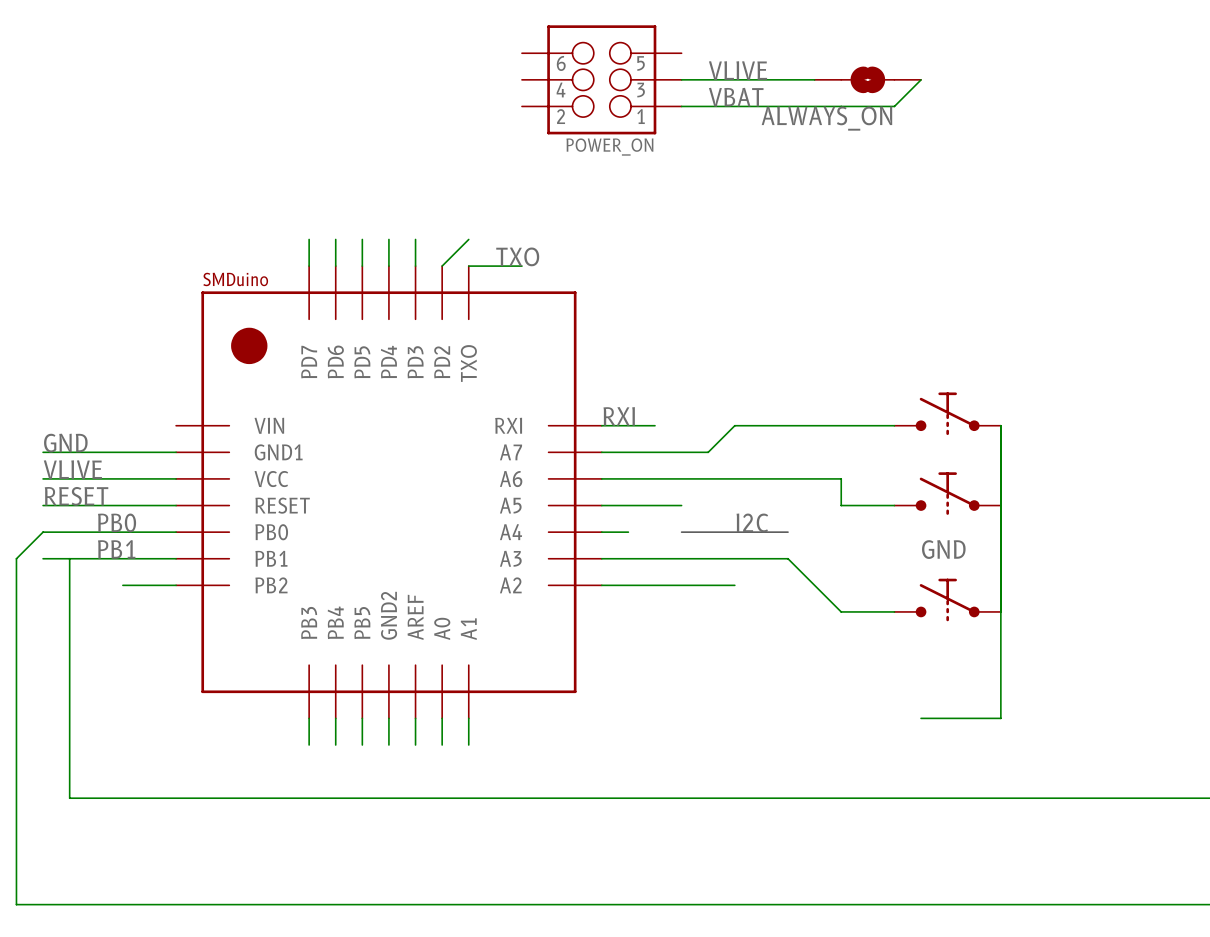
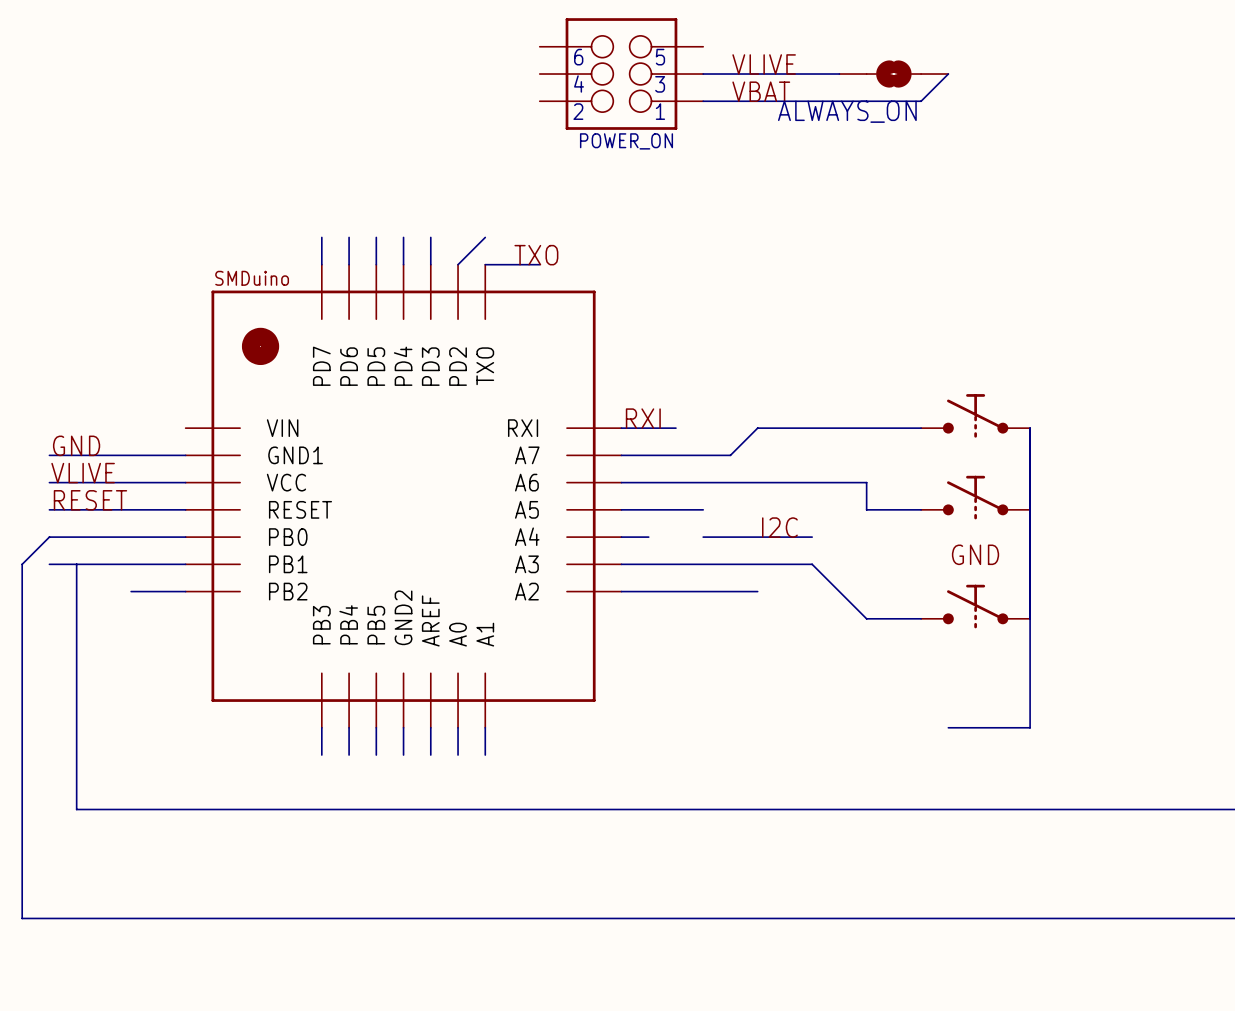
label: PB0 (117, 522) -> none
label: PB1 (116, 549) -> none

